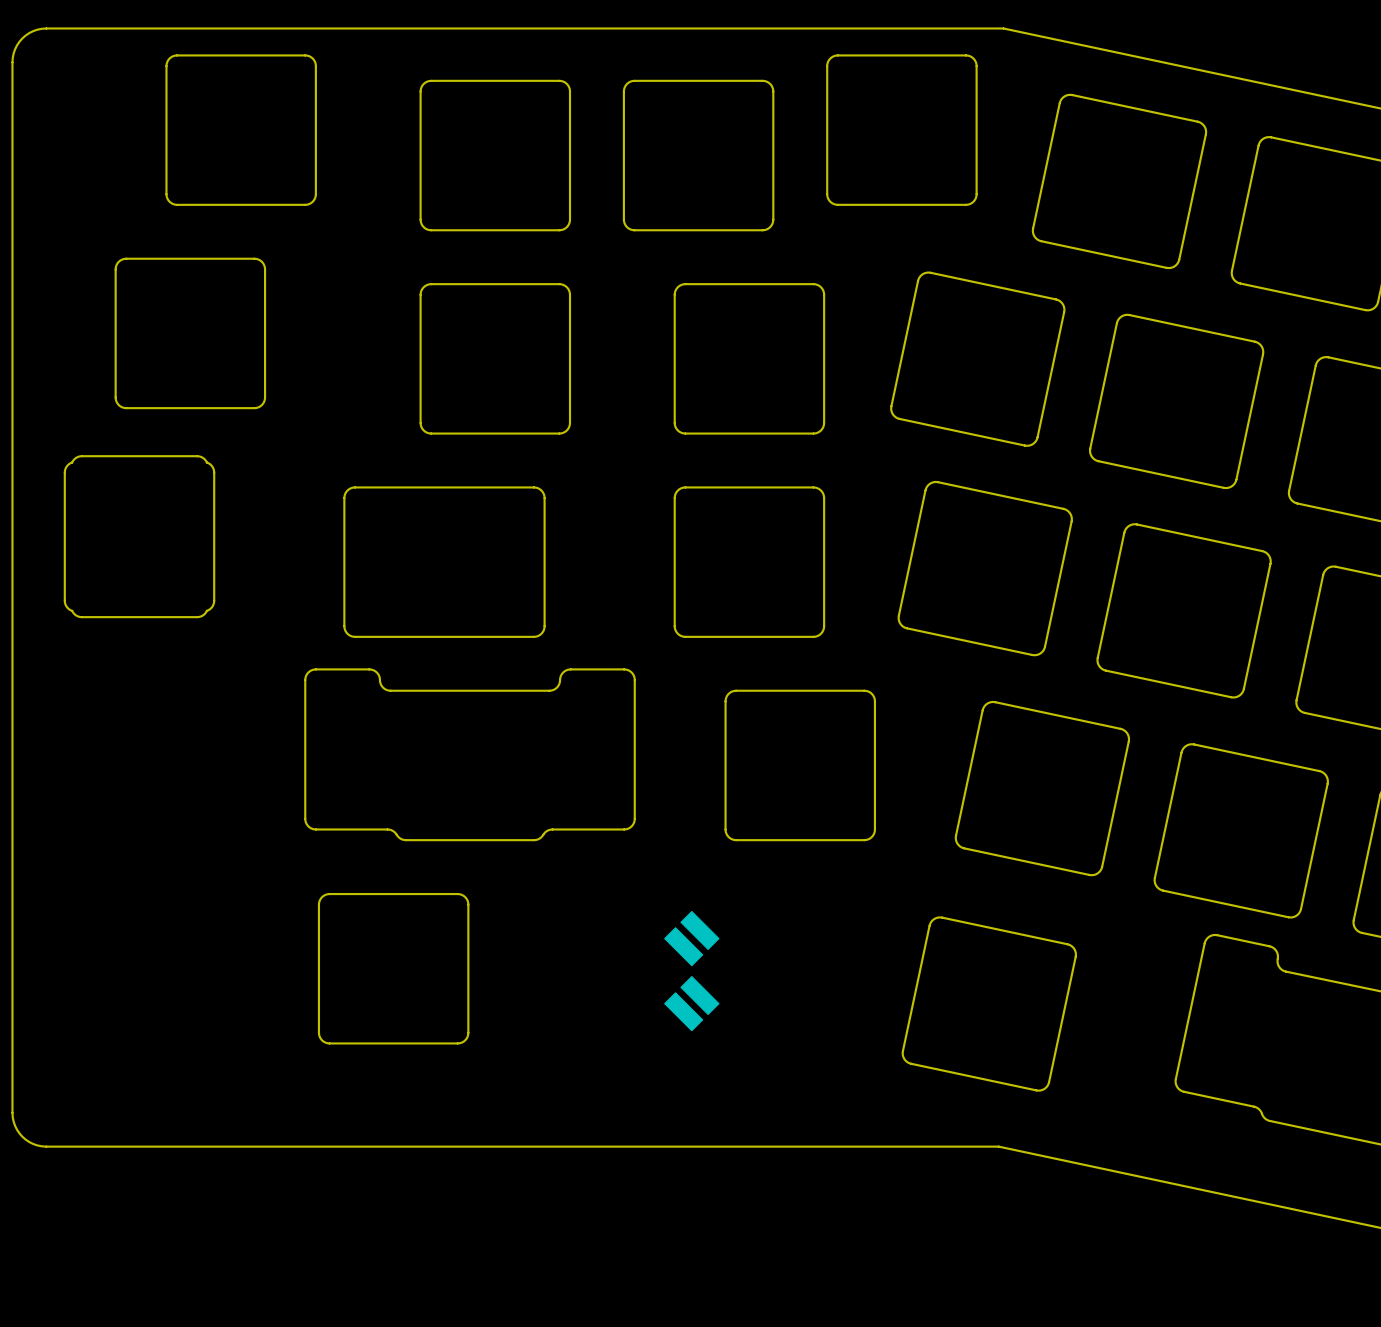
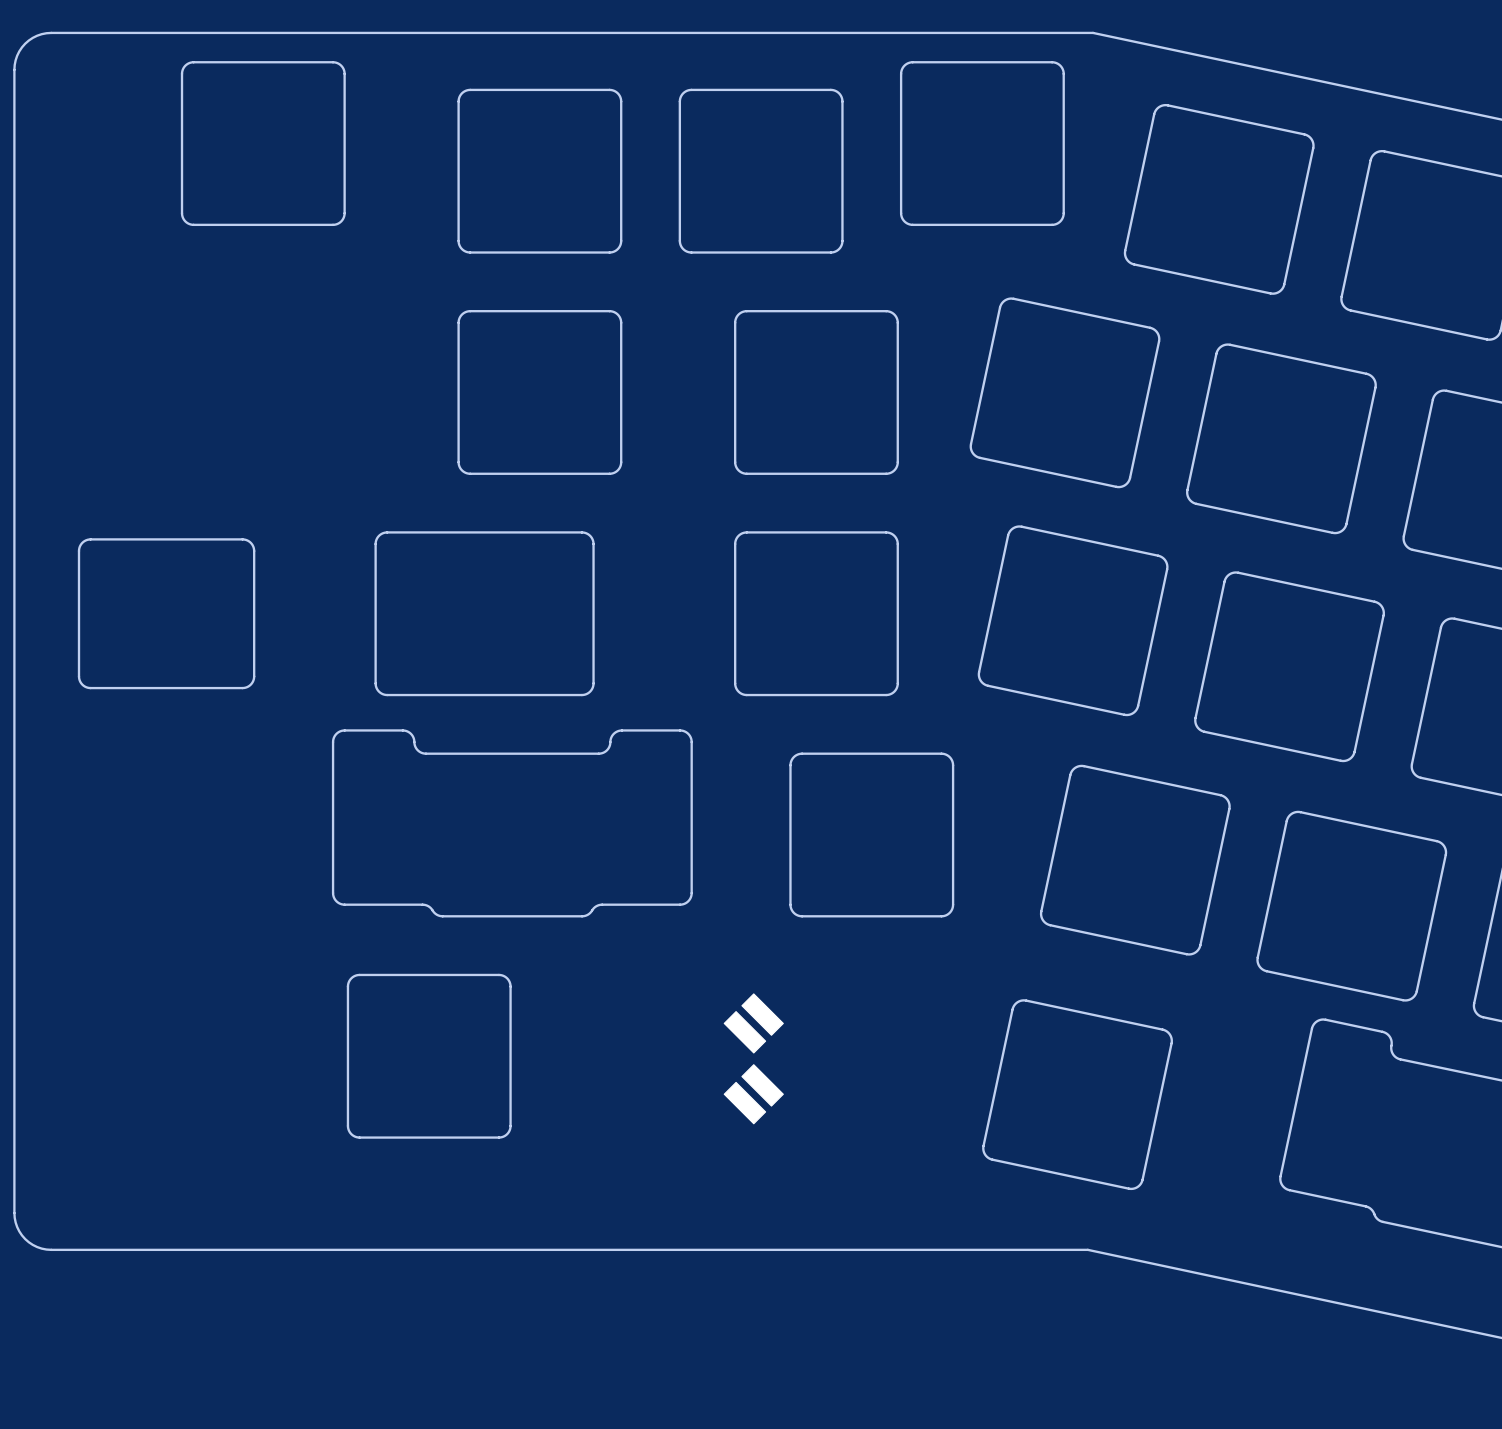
board edge: (126, 258) (254, 258) (261, 261) (265, 269) (265, 397) (261, 405) (254, 408) (126, 408) (118, 405) (115, 397) (115, 269) (118, 261) (126, 258) -> none
board edge: (206, 462) (212, 466) (214, 472) (214, 600) (212, 607) (206, 610) -> none
board edge: (206, 462) (202, 457) (197, 456) (80, 456) (67, 465) (64, 472) (64, 600) (67, 608) (76, 615) (81, 617) (197, 617) (202, 615) (206, 610) -> none
board edge: none -> (90, 539) (242, 539) (250, 542) (254, 551) (254, 676) (250, 684) (242, 688) (90, 688) (82, 684) (79, 676) (79, 551) (82, 542) (90, 539)

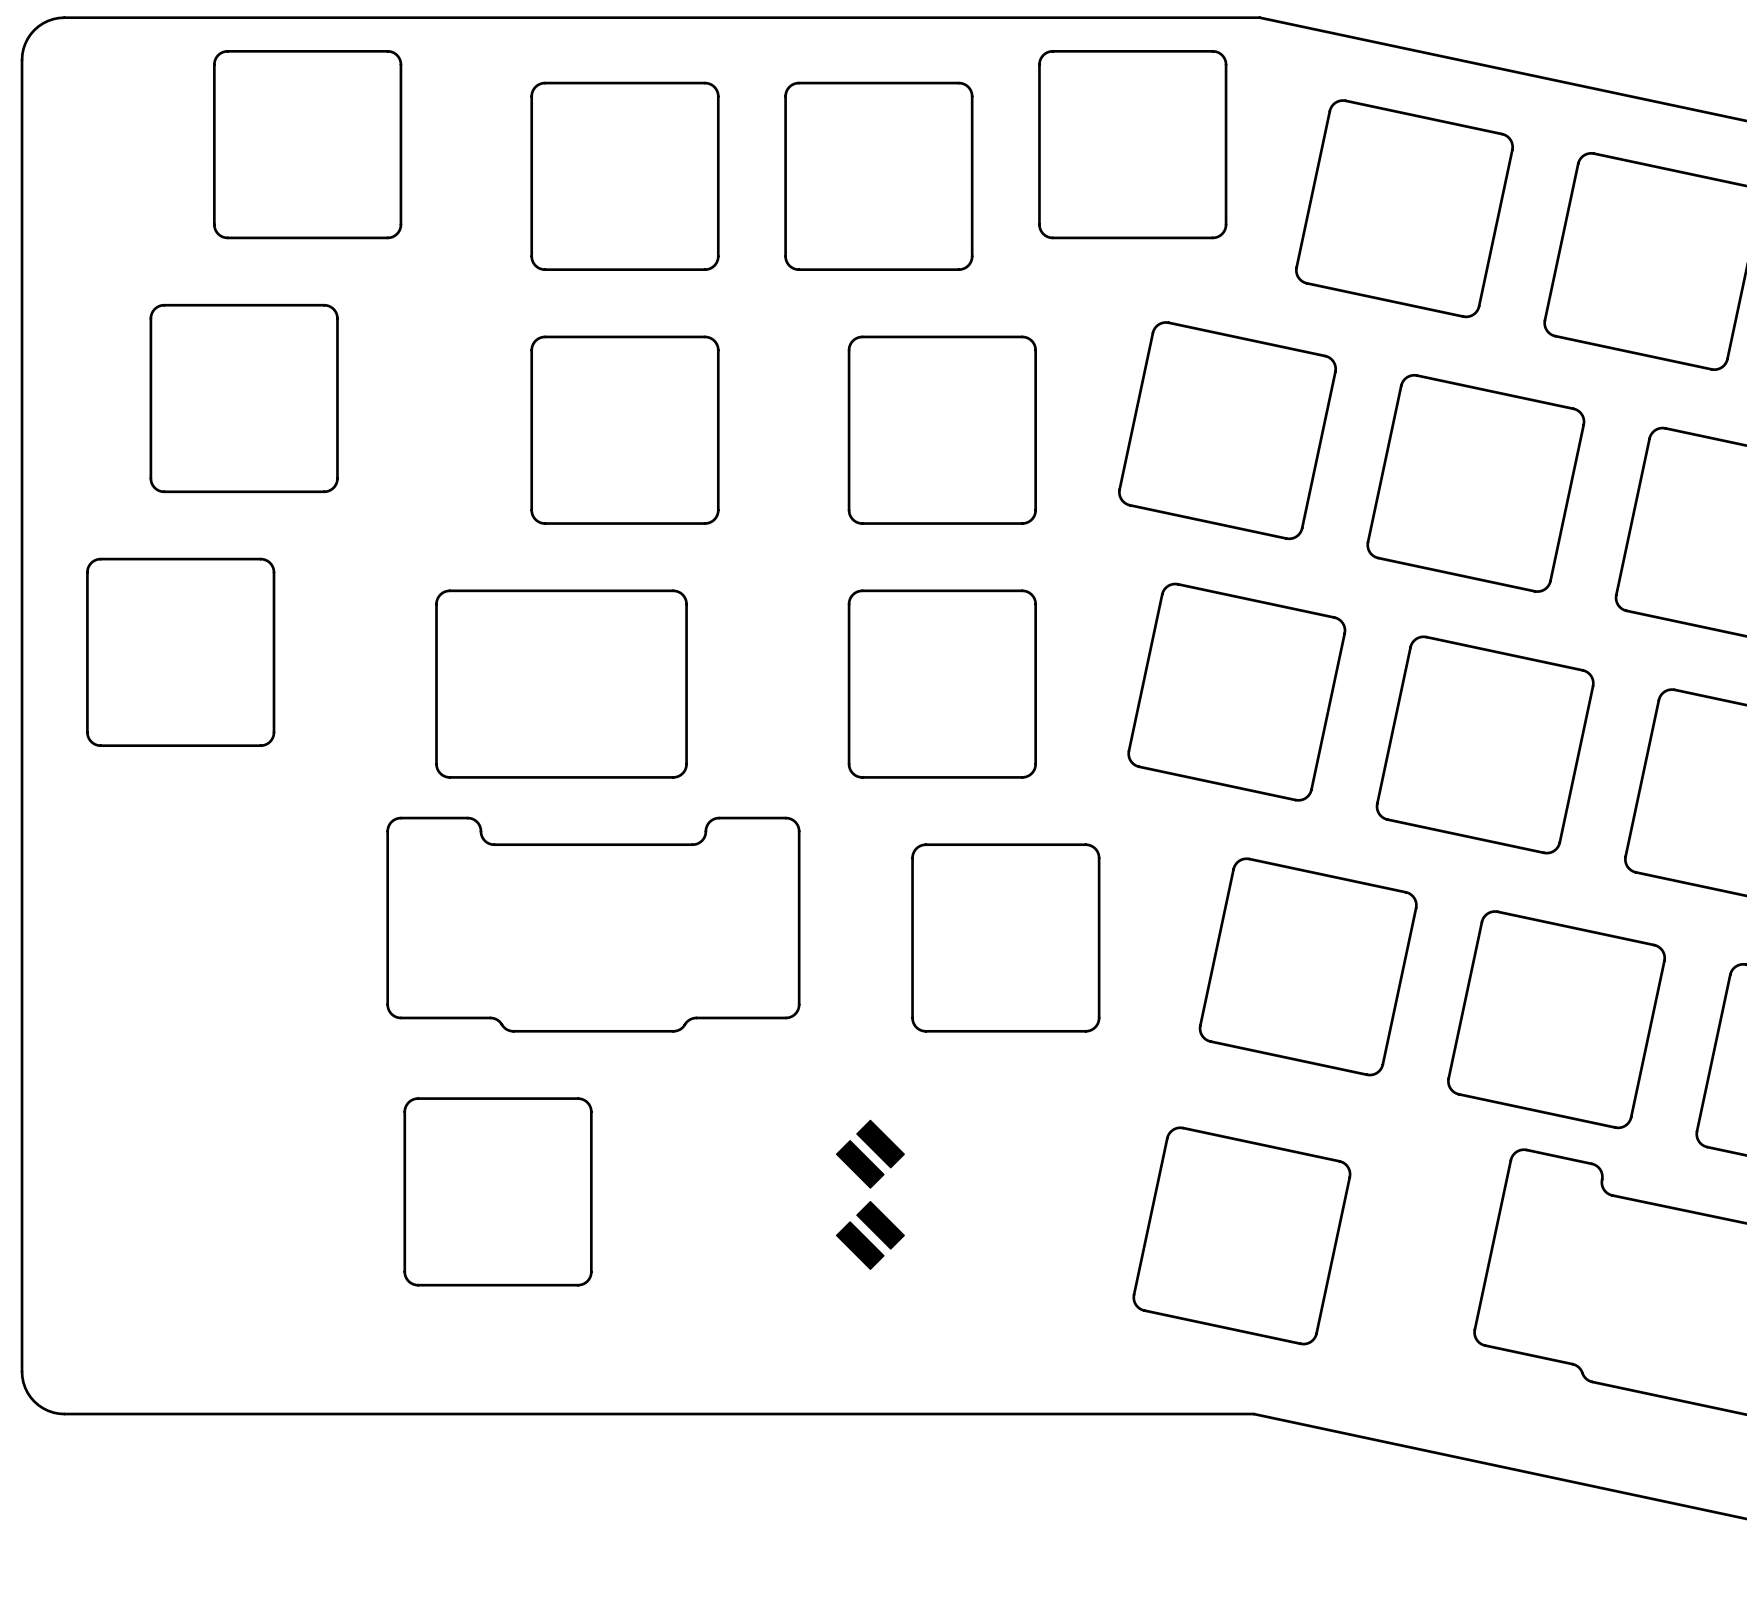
board edge: none -> (164, 305) (324, 305) (333, 309) (337, 318) (337, 478) (333, 487) (324, 491) (164, 491) (154, 487) (150, 478) (150, 318) (154, 309) (164, 305)
board edge: (90, 539) (242, 539) (250, 542) (254, 551) (254, 676) (250, 684) (242, 688) (90, 688) (82, 684) (79, 676) (79, 551) (82, 542) (90, 539) -> (100, 559) (91, 563) (87, 572) (87, 732) (91, 741) (100, 745) (260, 745) (270, 741) (273, 732) (273, 572) (270, 563) (260, 559) (100, 559)

